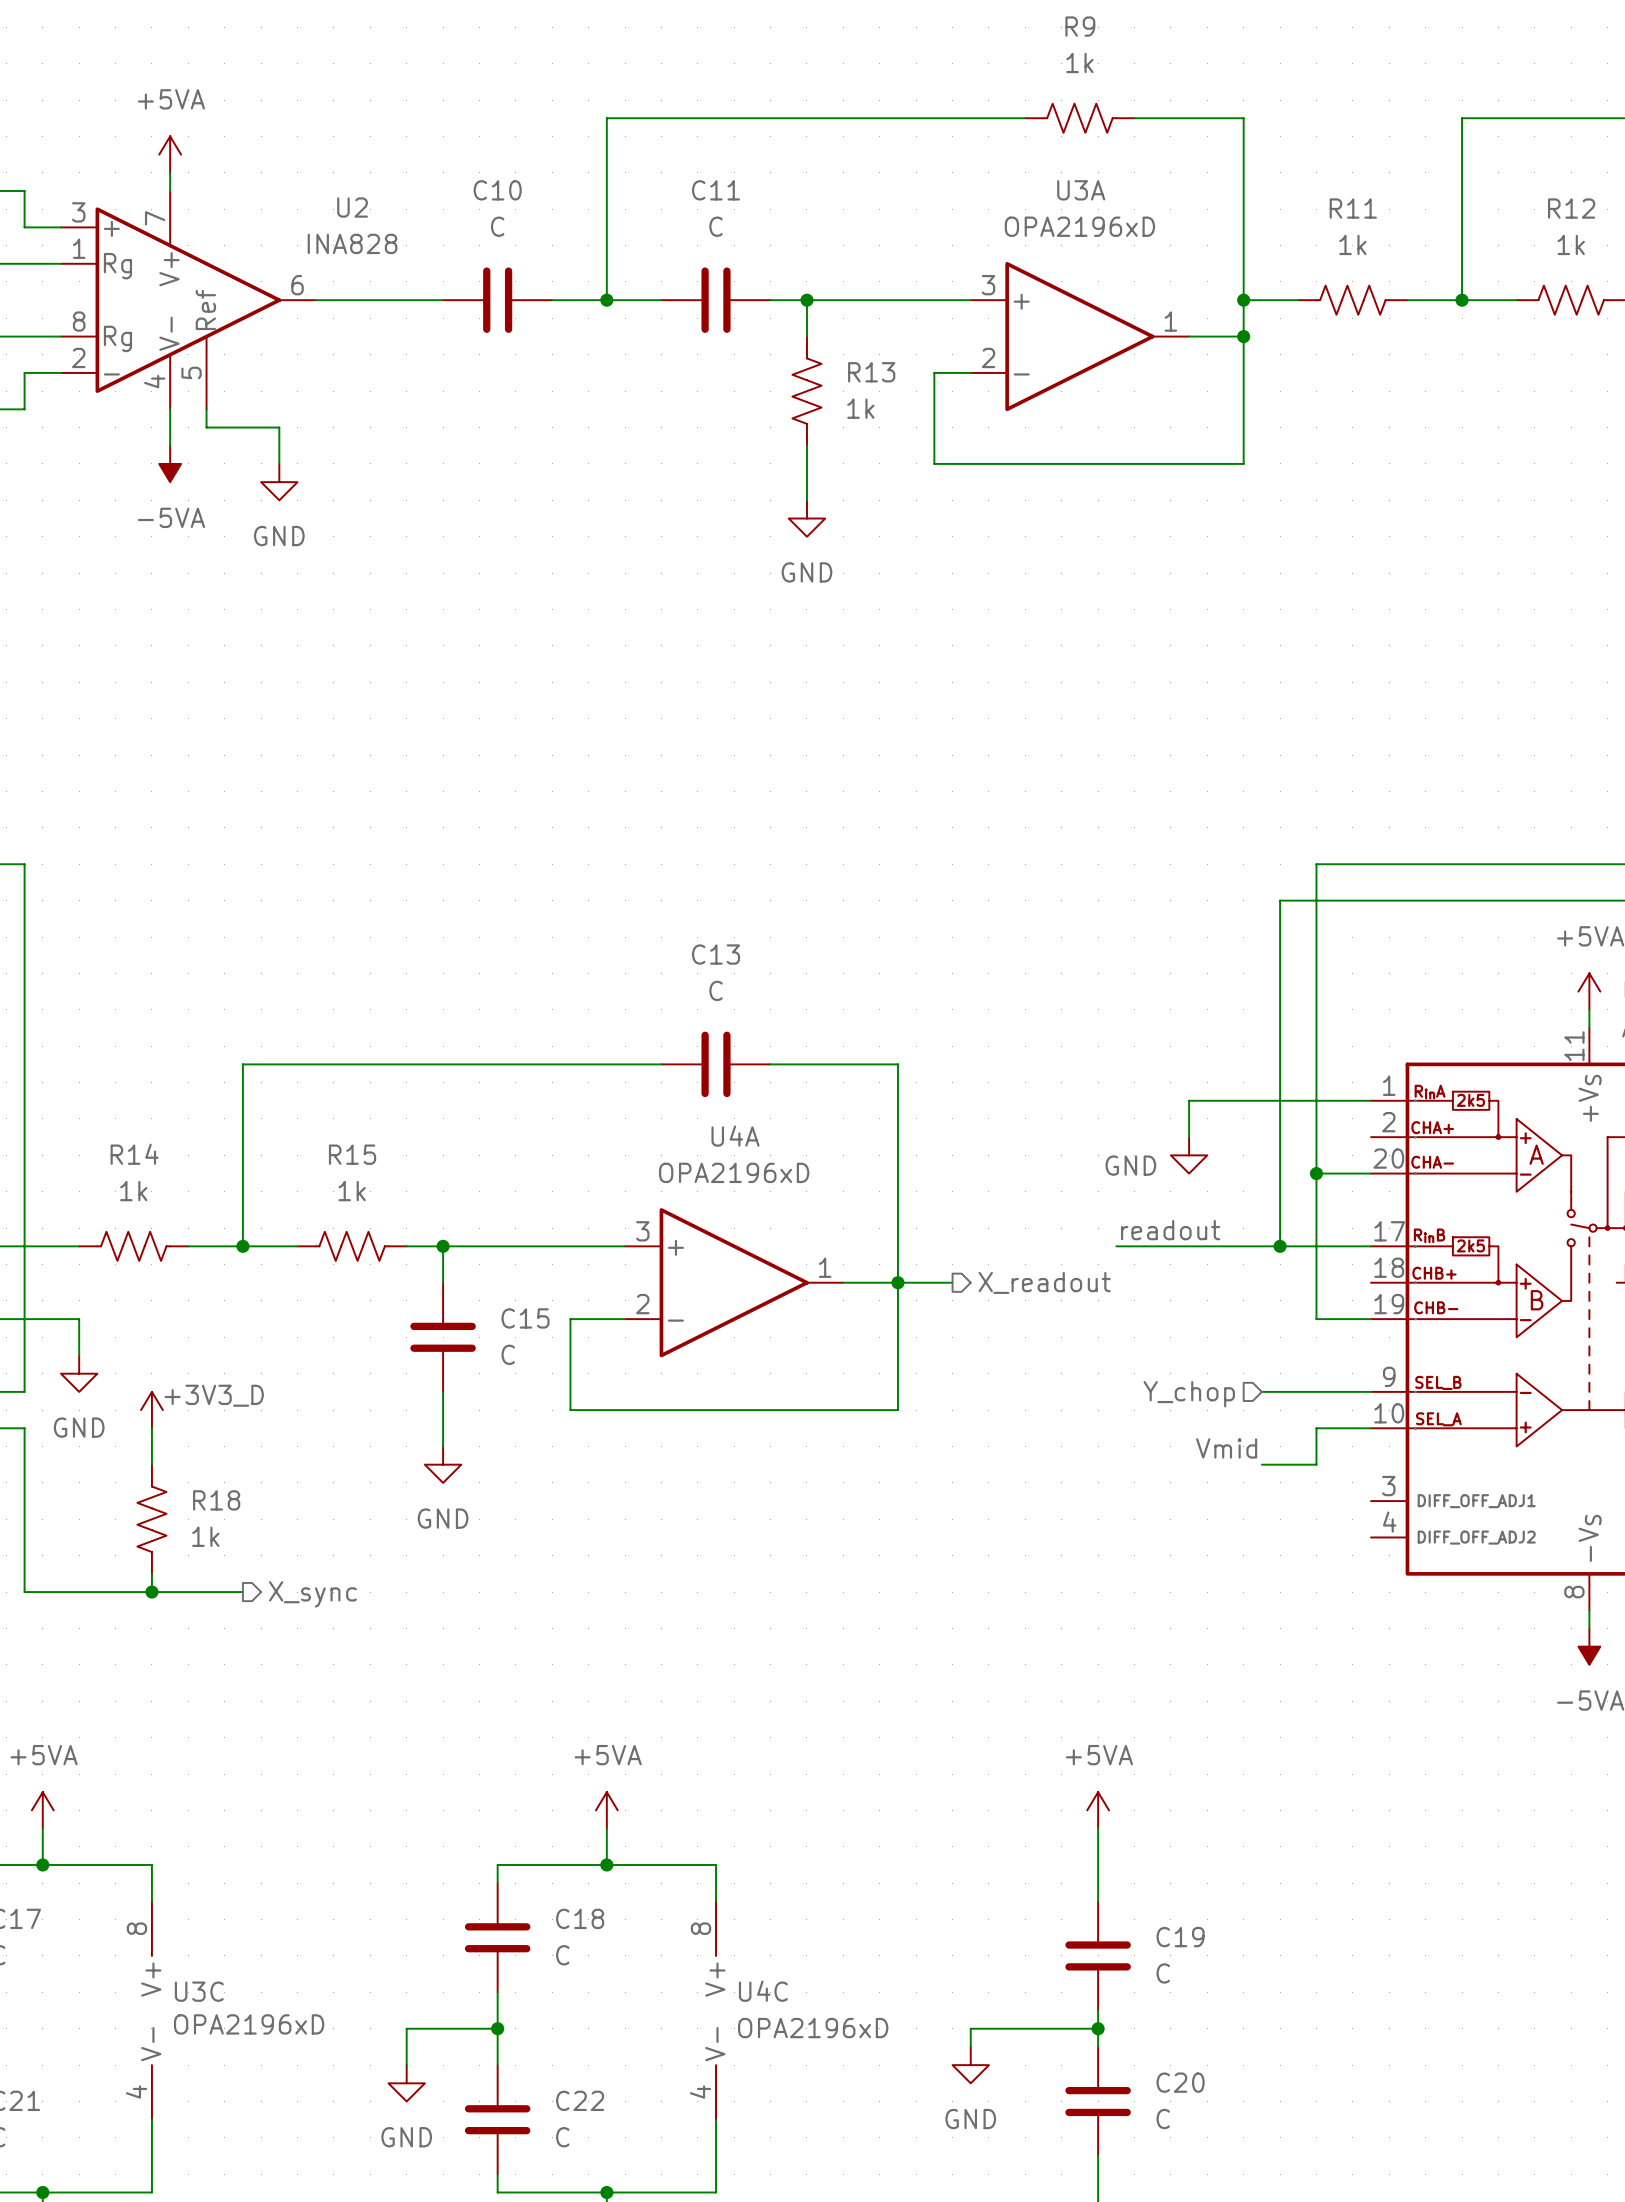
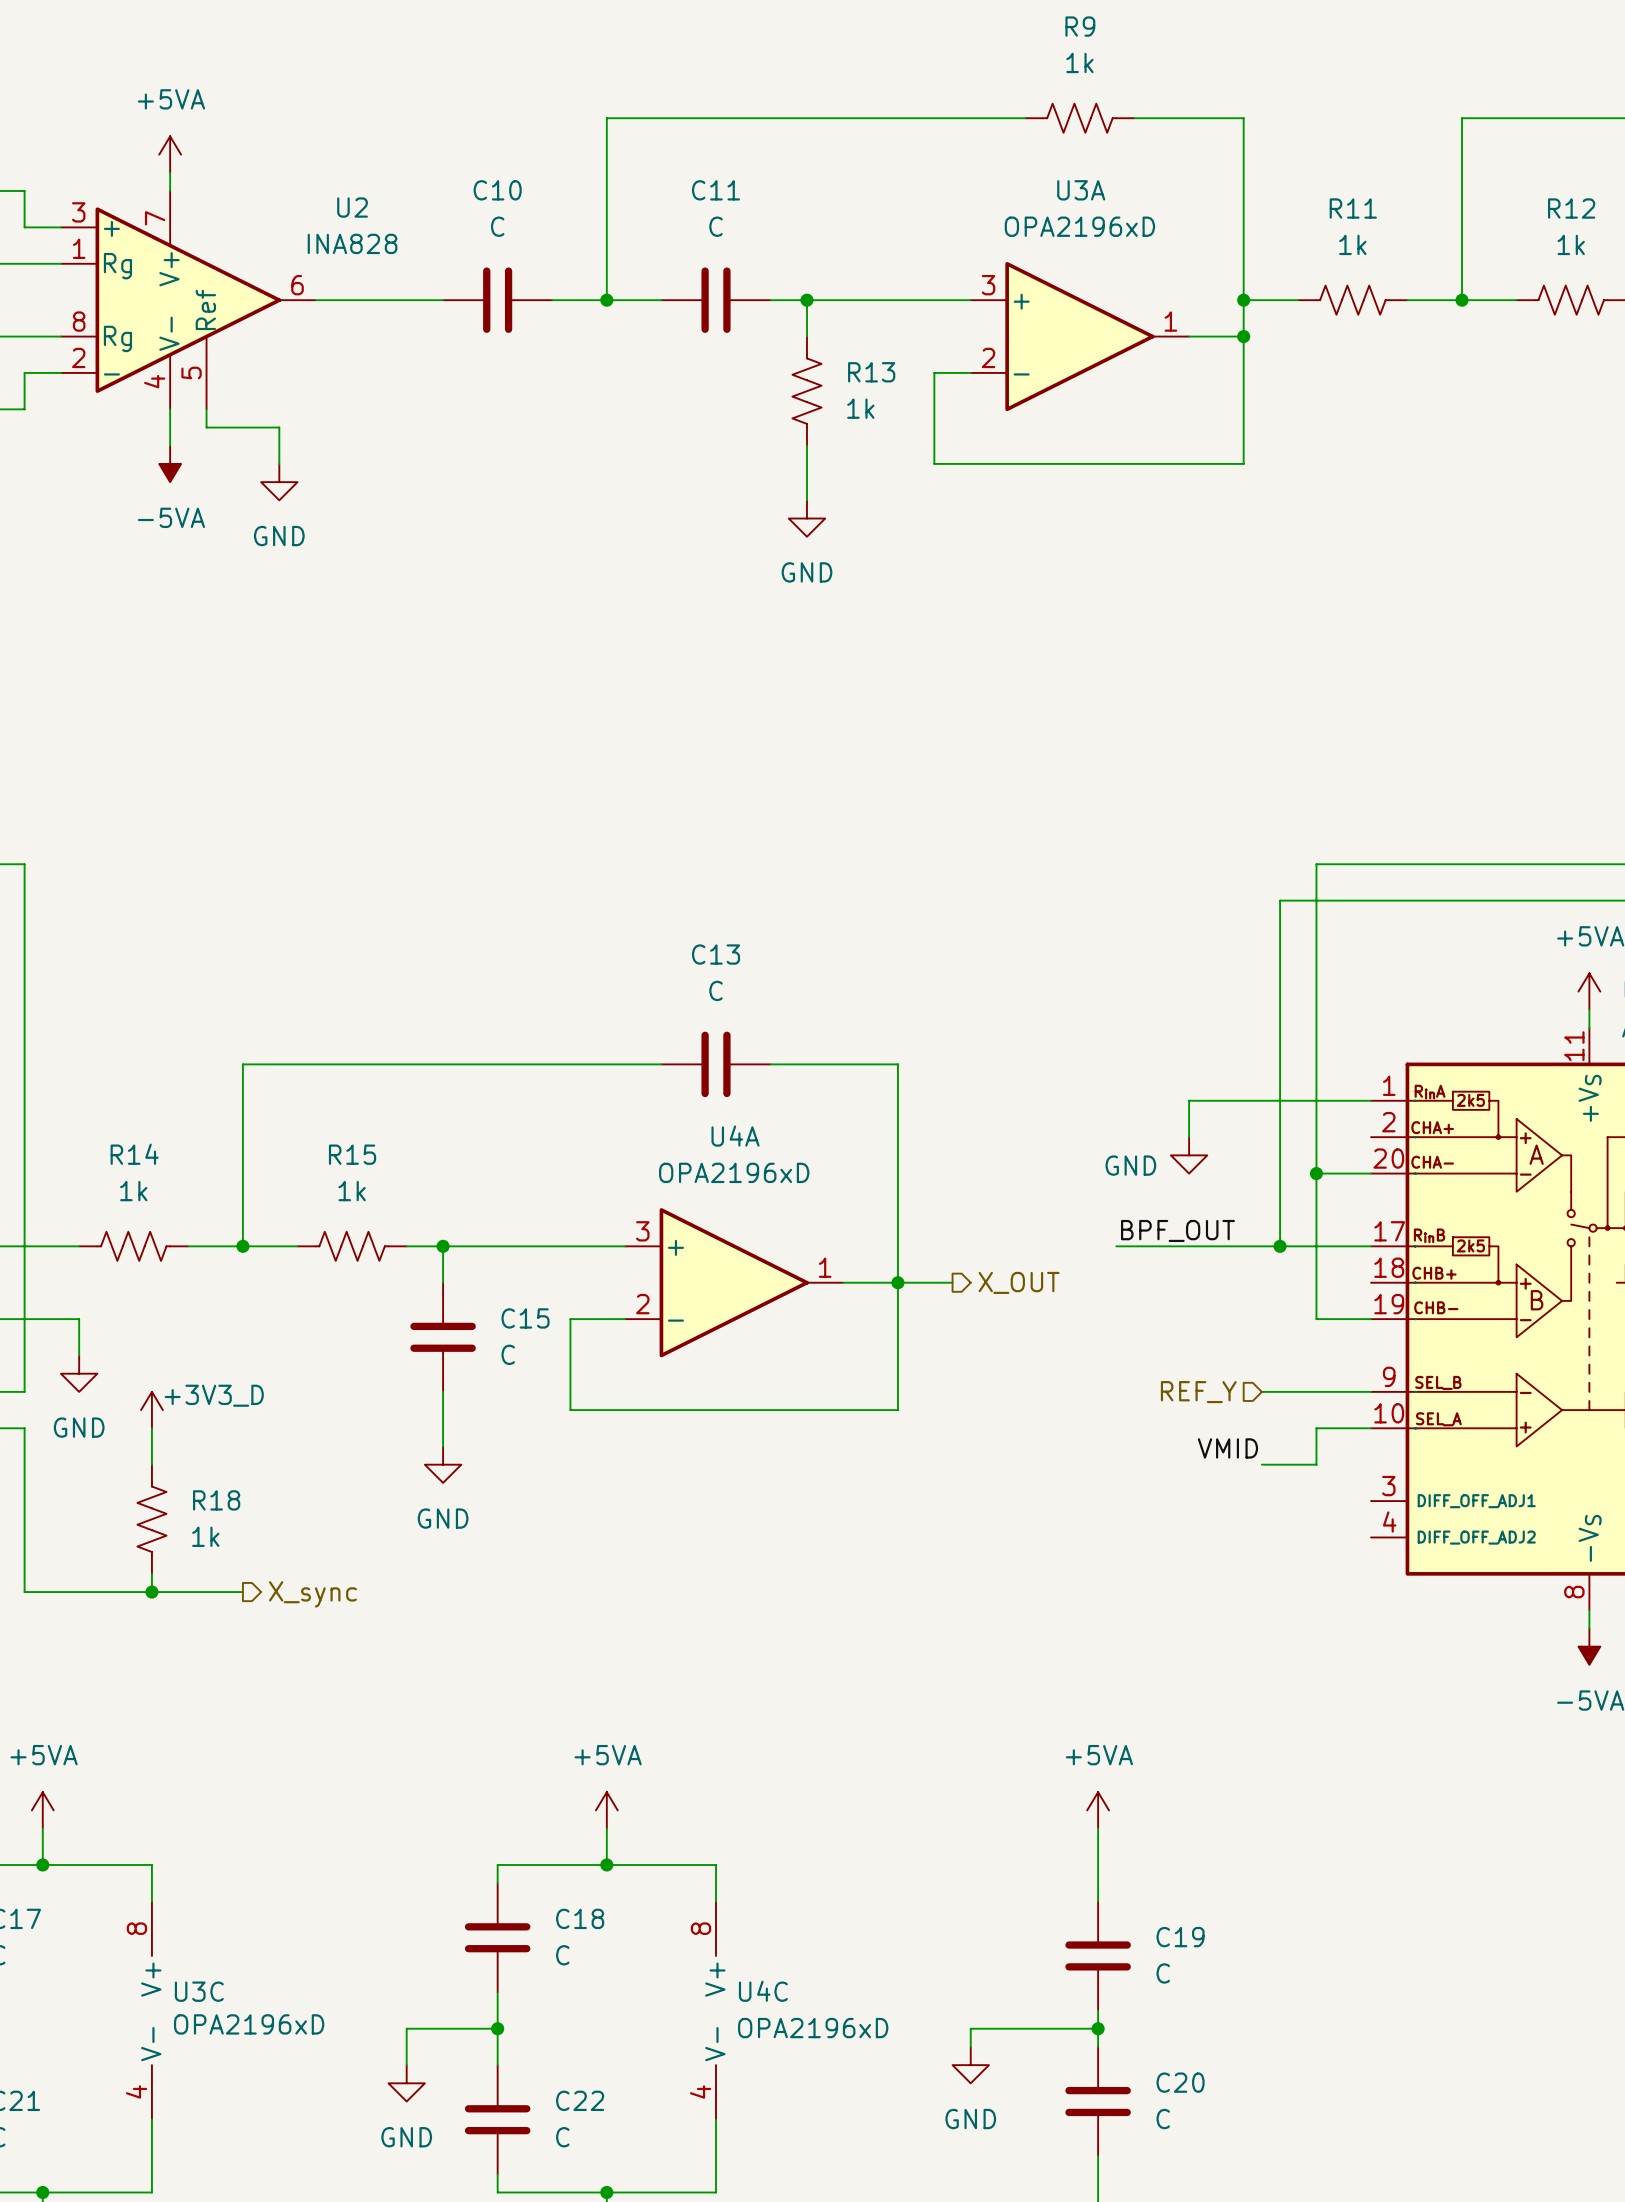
label: readout (1170, 1230) -> BPF_OUT (1177, 1230)
hierarchical label: X_readout (1044, 1282) -> X_OUT (1019, 1282)
hierarchical label: Y_chop (1189, 1394) -> REF_Y (1198, 1392)
label: Vmid (1226, 1448) -> VMID (1227, 1448)

